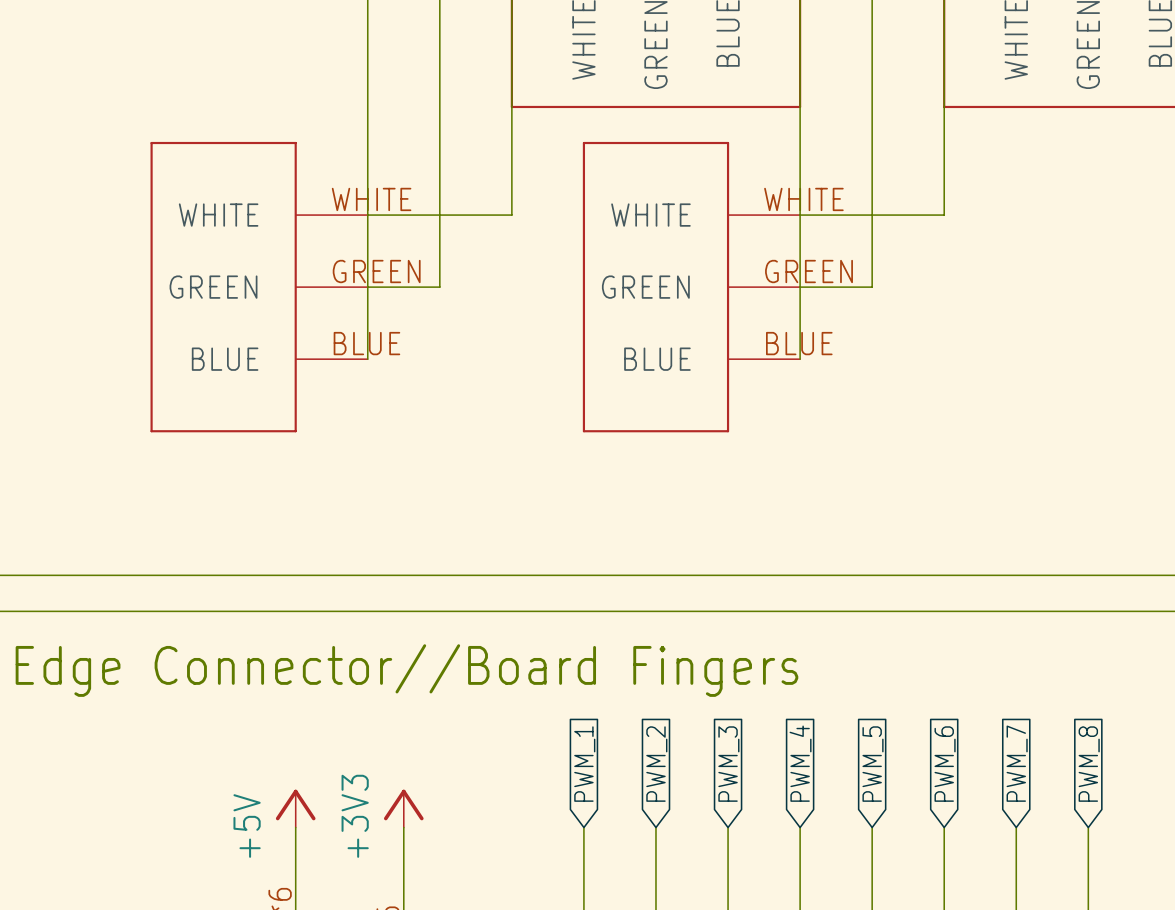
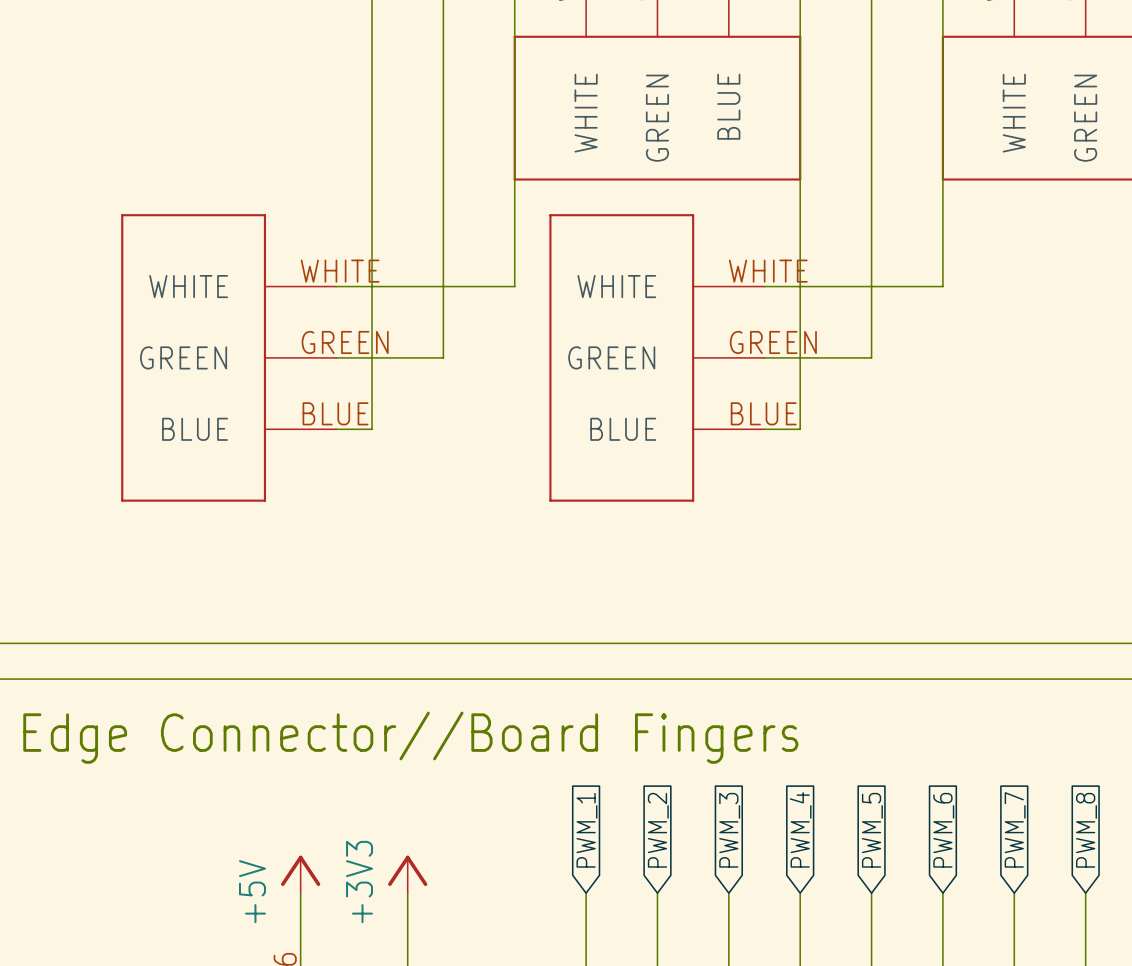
part position: (259, 287) -> (228, 357)
part position: (691, 287) -> (656, 357)

